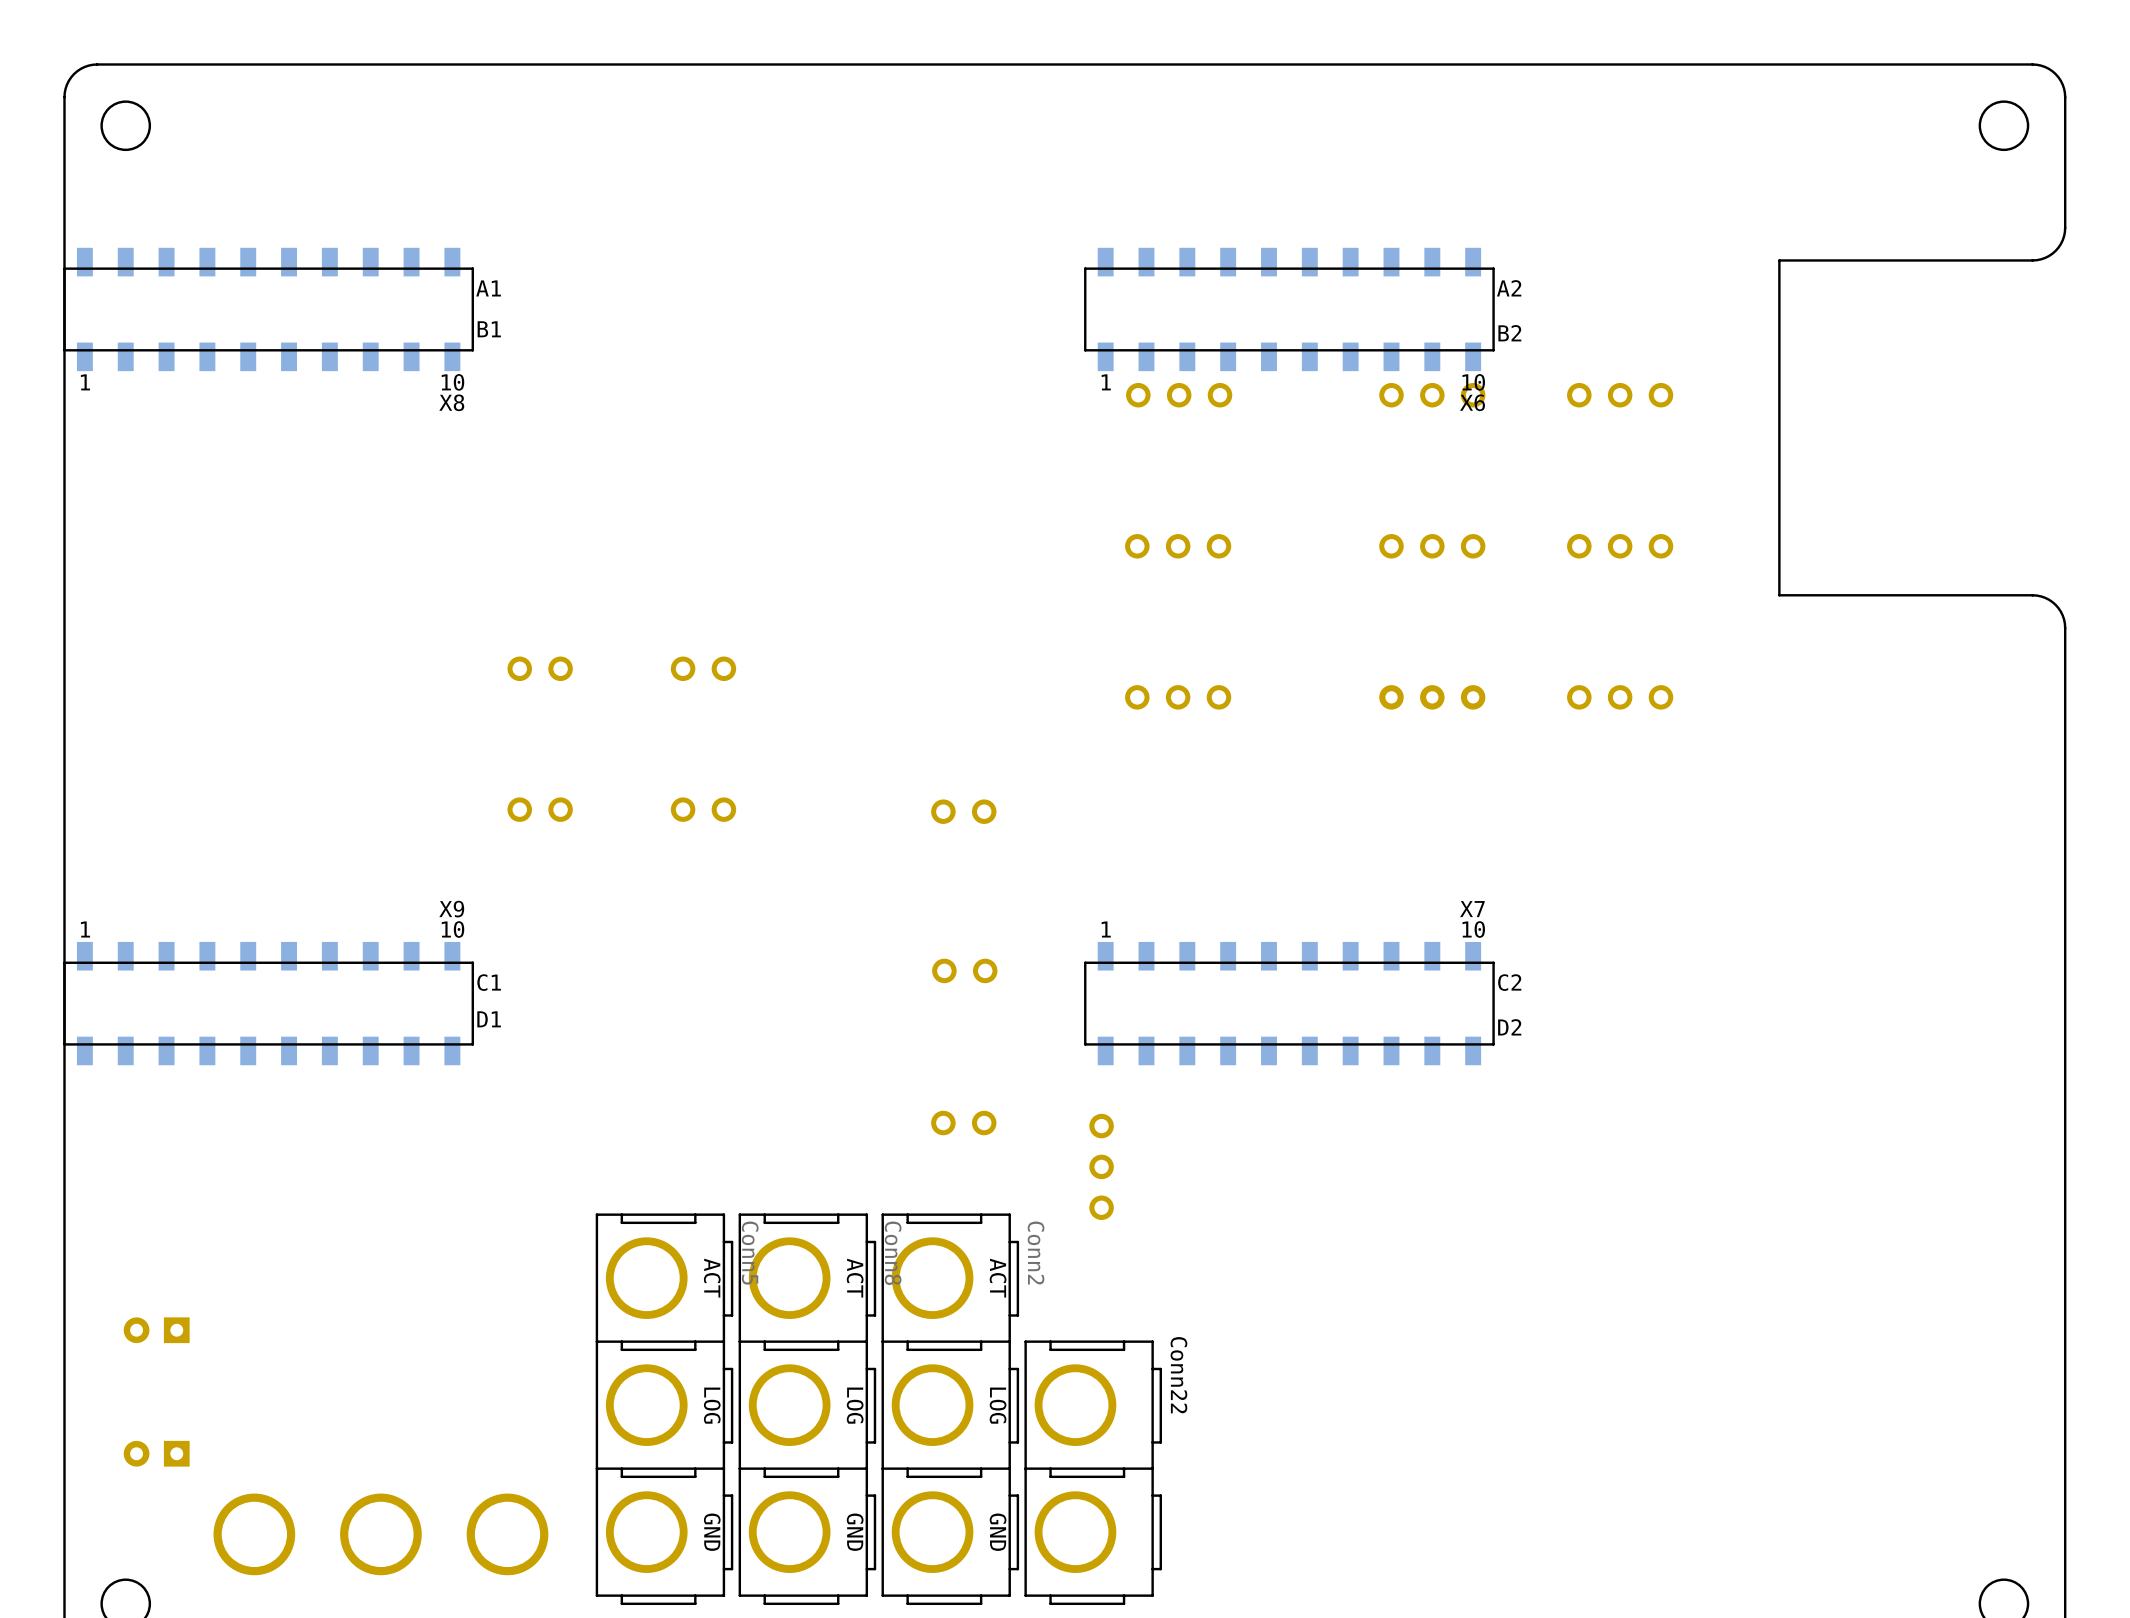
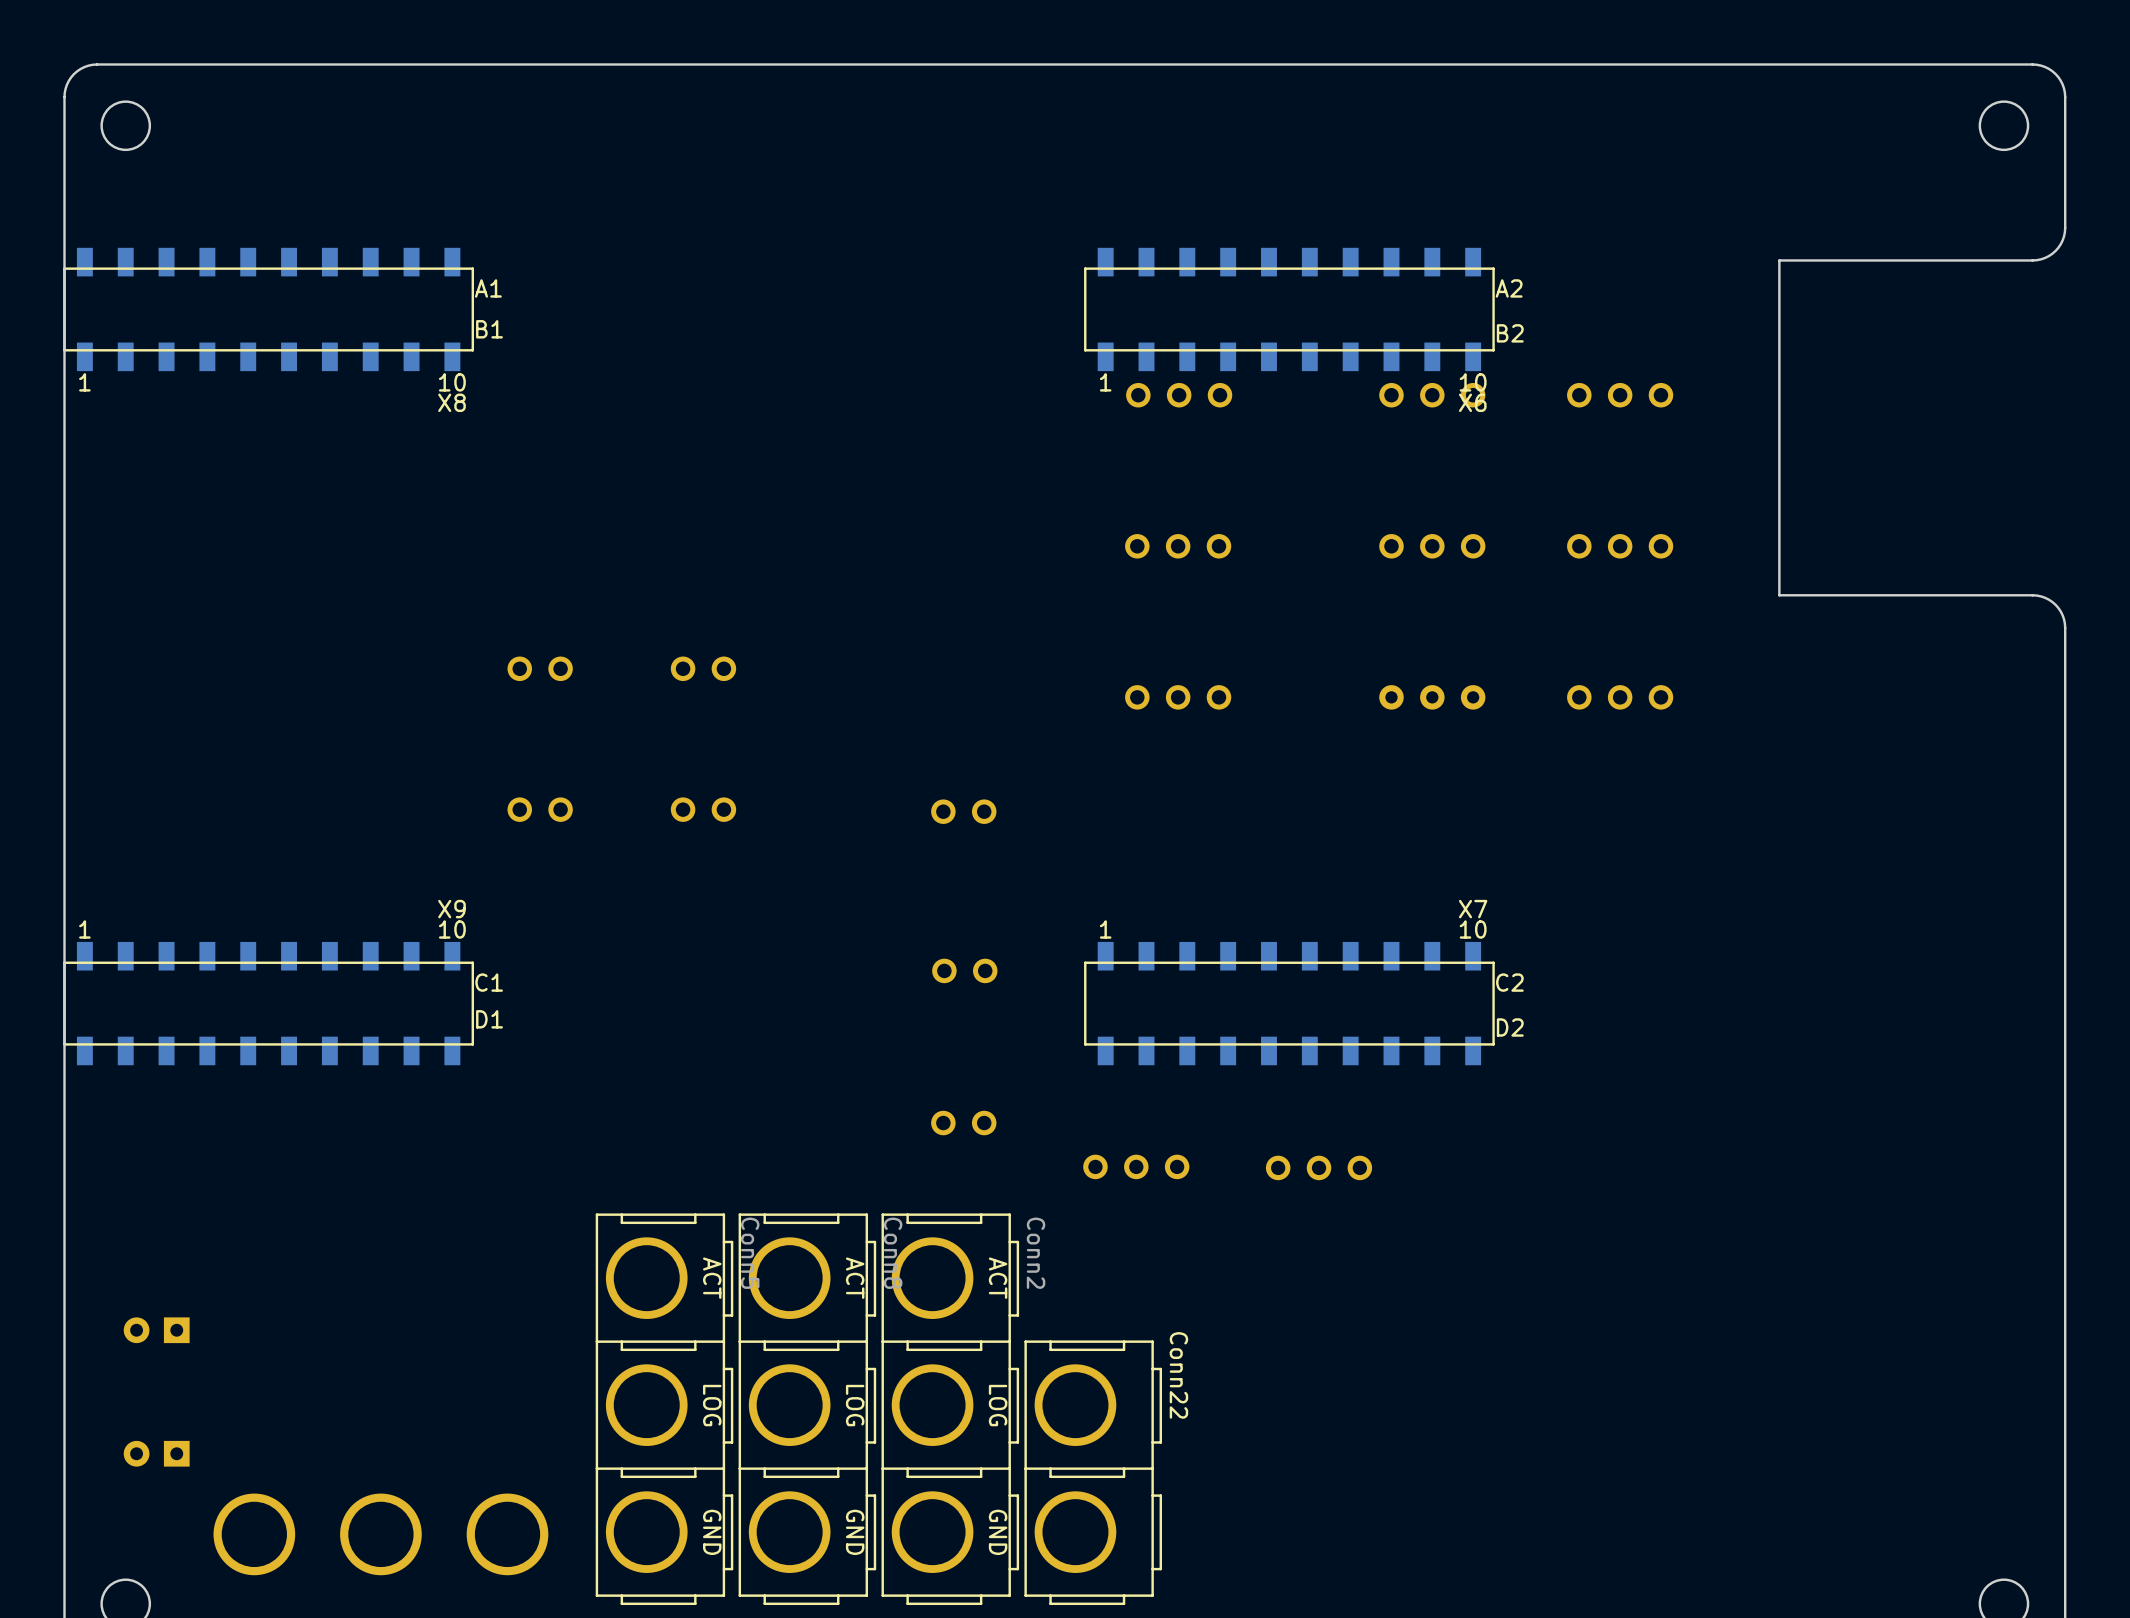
part rotation: 0° (1101, 1166) -> 90° clockwise (1136, 1166)
part: none -> (1319, 1167)

